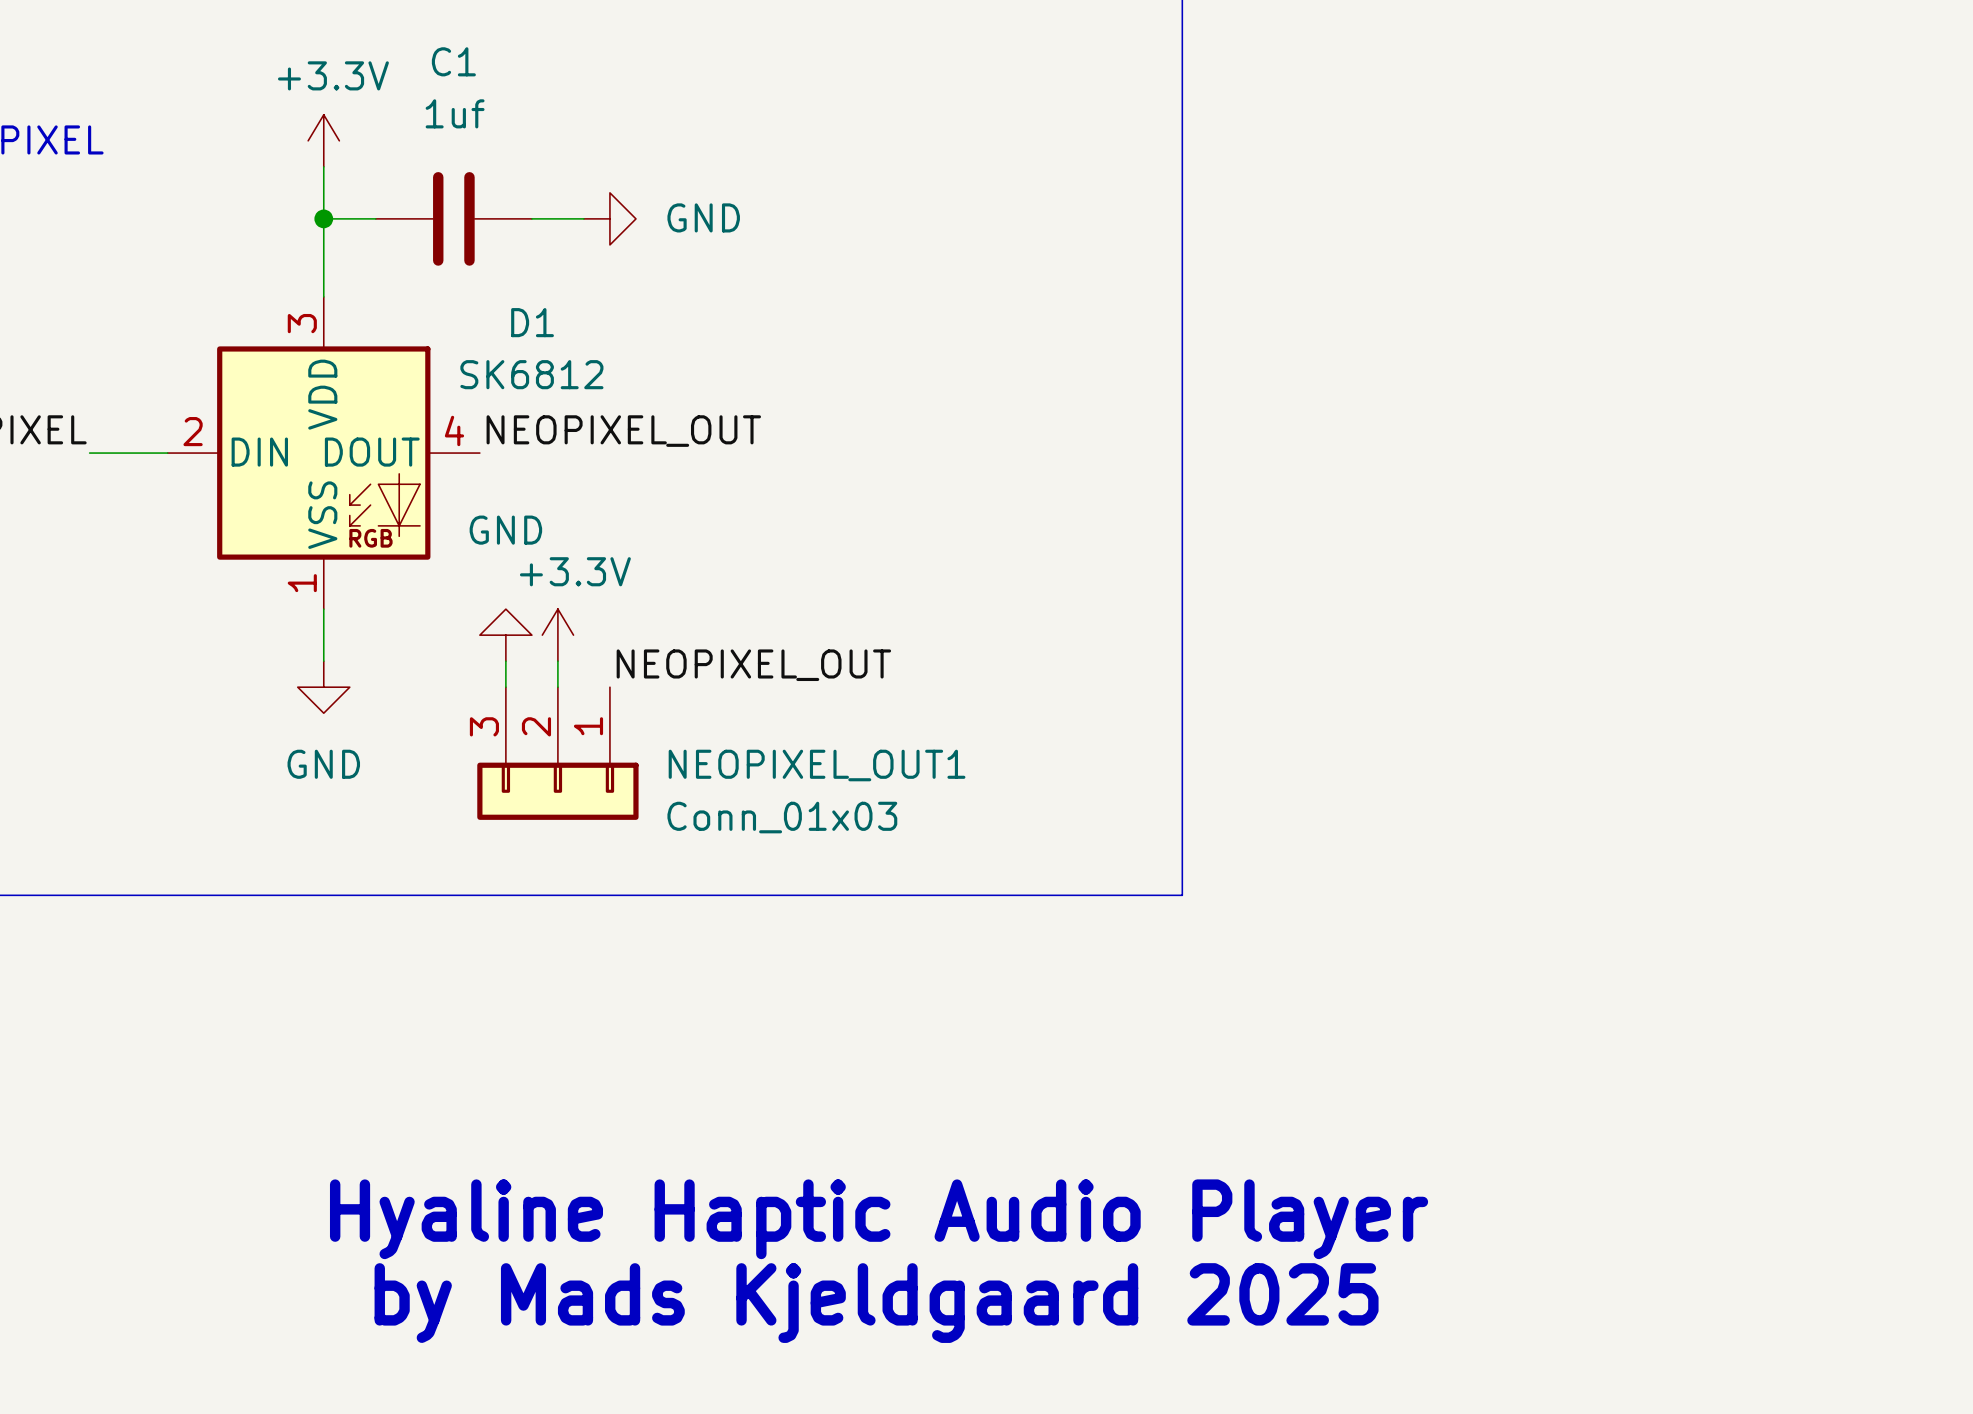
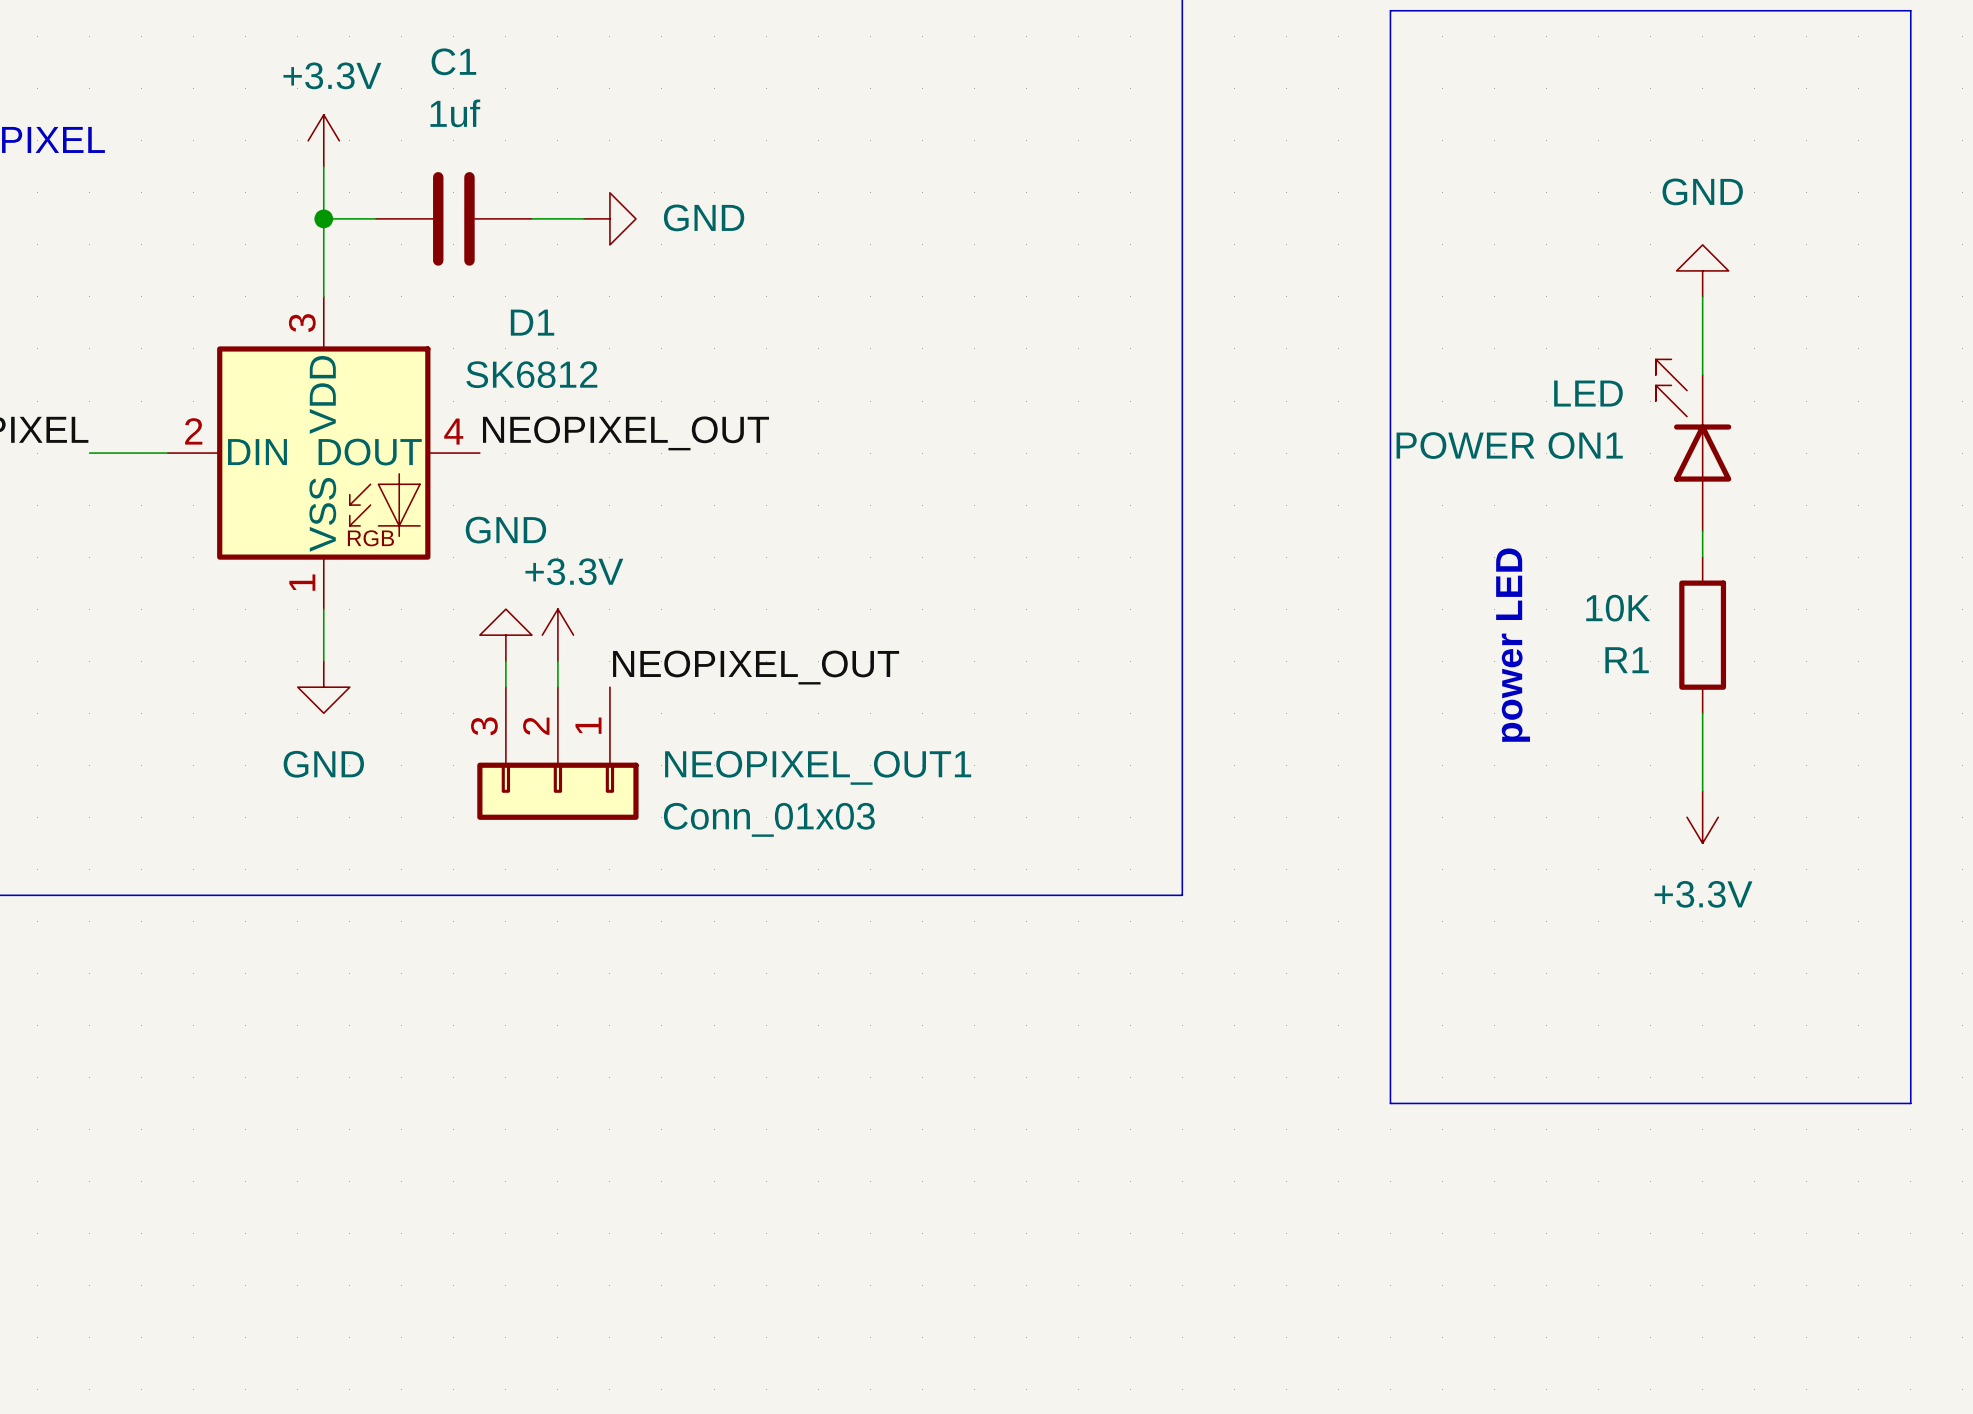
line: none -> (1390, 10) (1910, 10) (1910, 1103) (1390, 1103) (1390, 10)
power symbol: none -> GND (1702, 270)
wire: none -> (1702, 296) (1702, 374)
POWER ON1: none -> LED (1693, 445)
wire: none -> (1702, 531) (1702, 557)
R1: none -> 10K (1702, 635)
text: none -> power LED (1513, 645)
wire: none -> (1702, 713) (1702, 791)
power symbol: none -> +3.3V (1702, 817)
text: Hyaline Haptic Audio Player (879, 1219) -> none
text: by Mads Kjeldgaard 2025 (876, 1303) -> none

